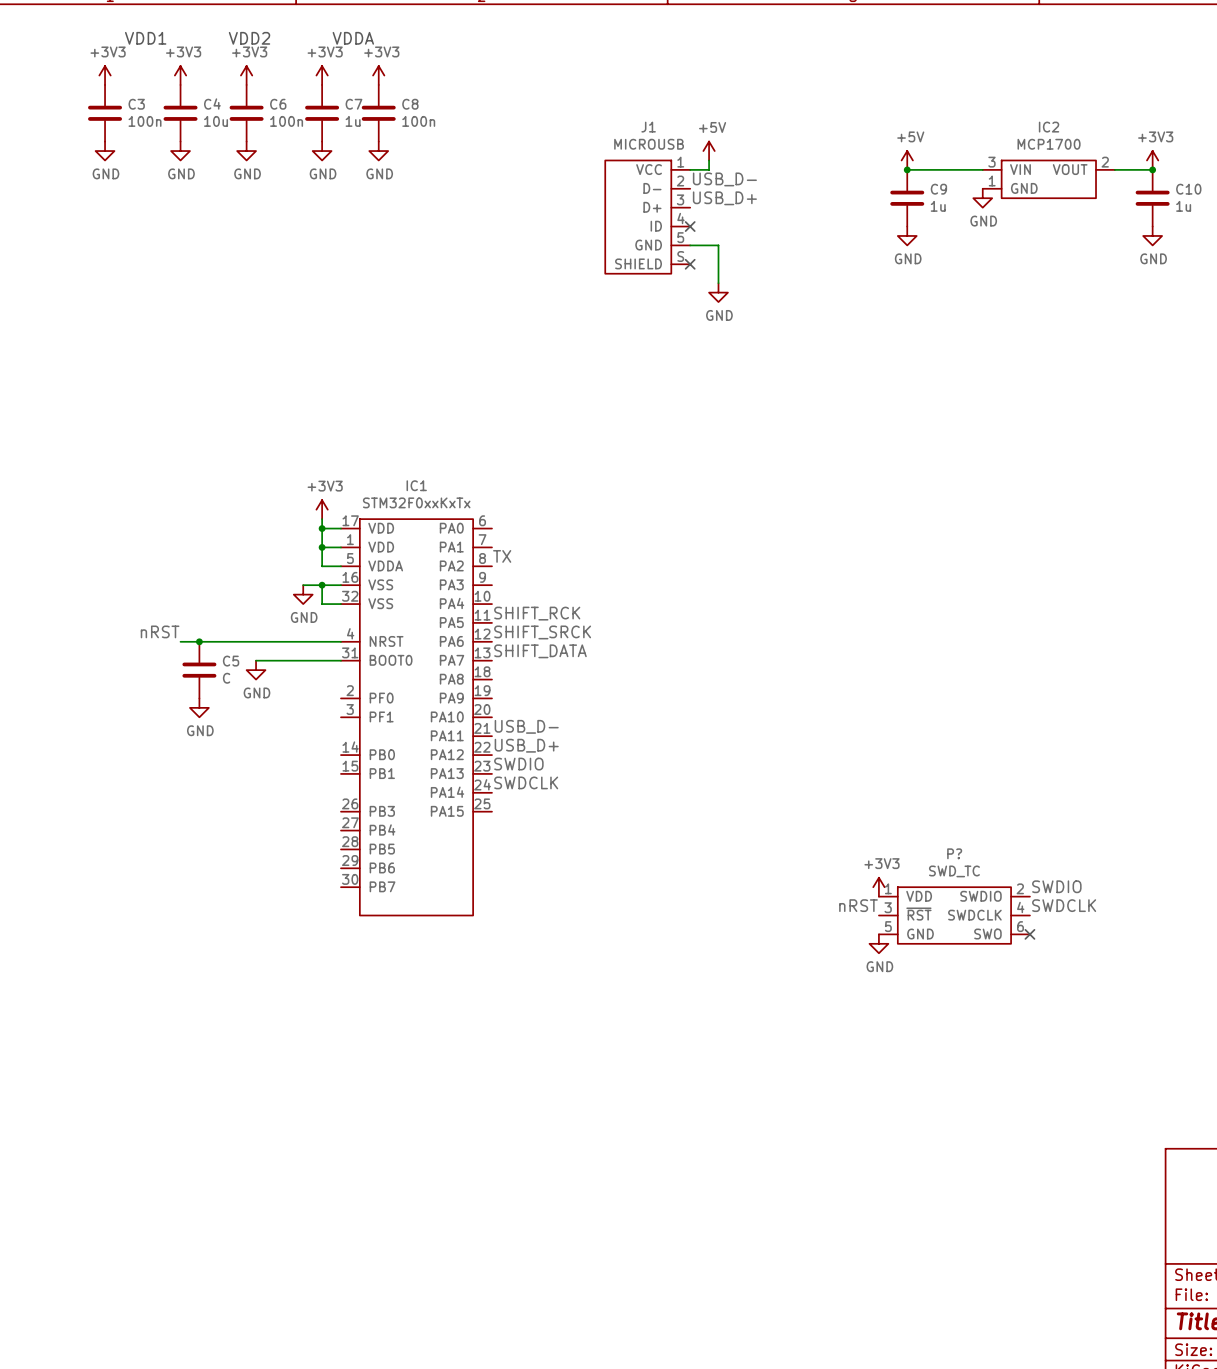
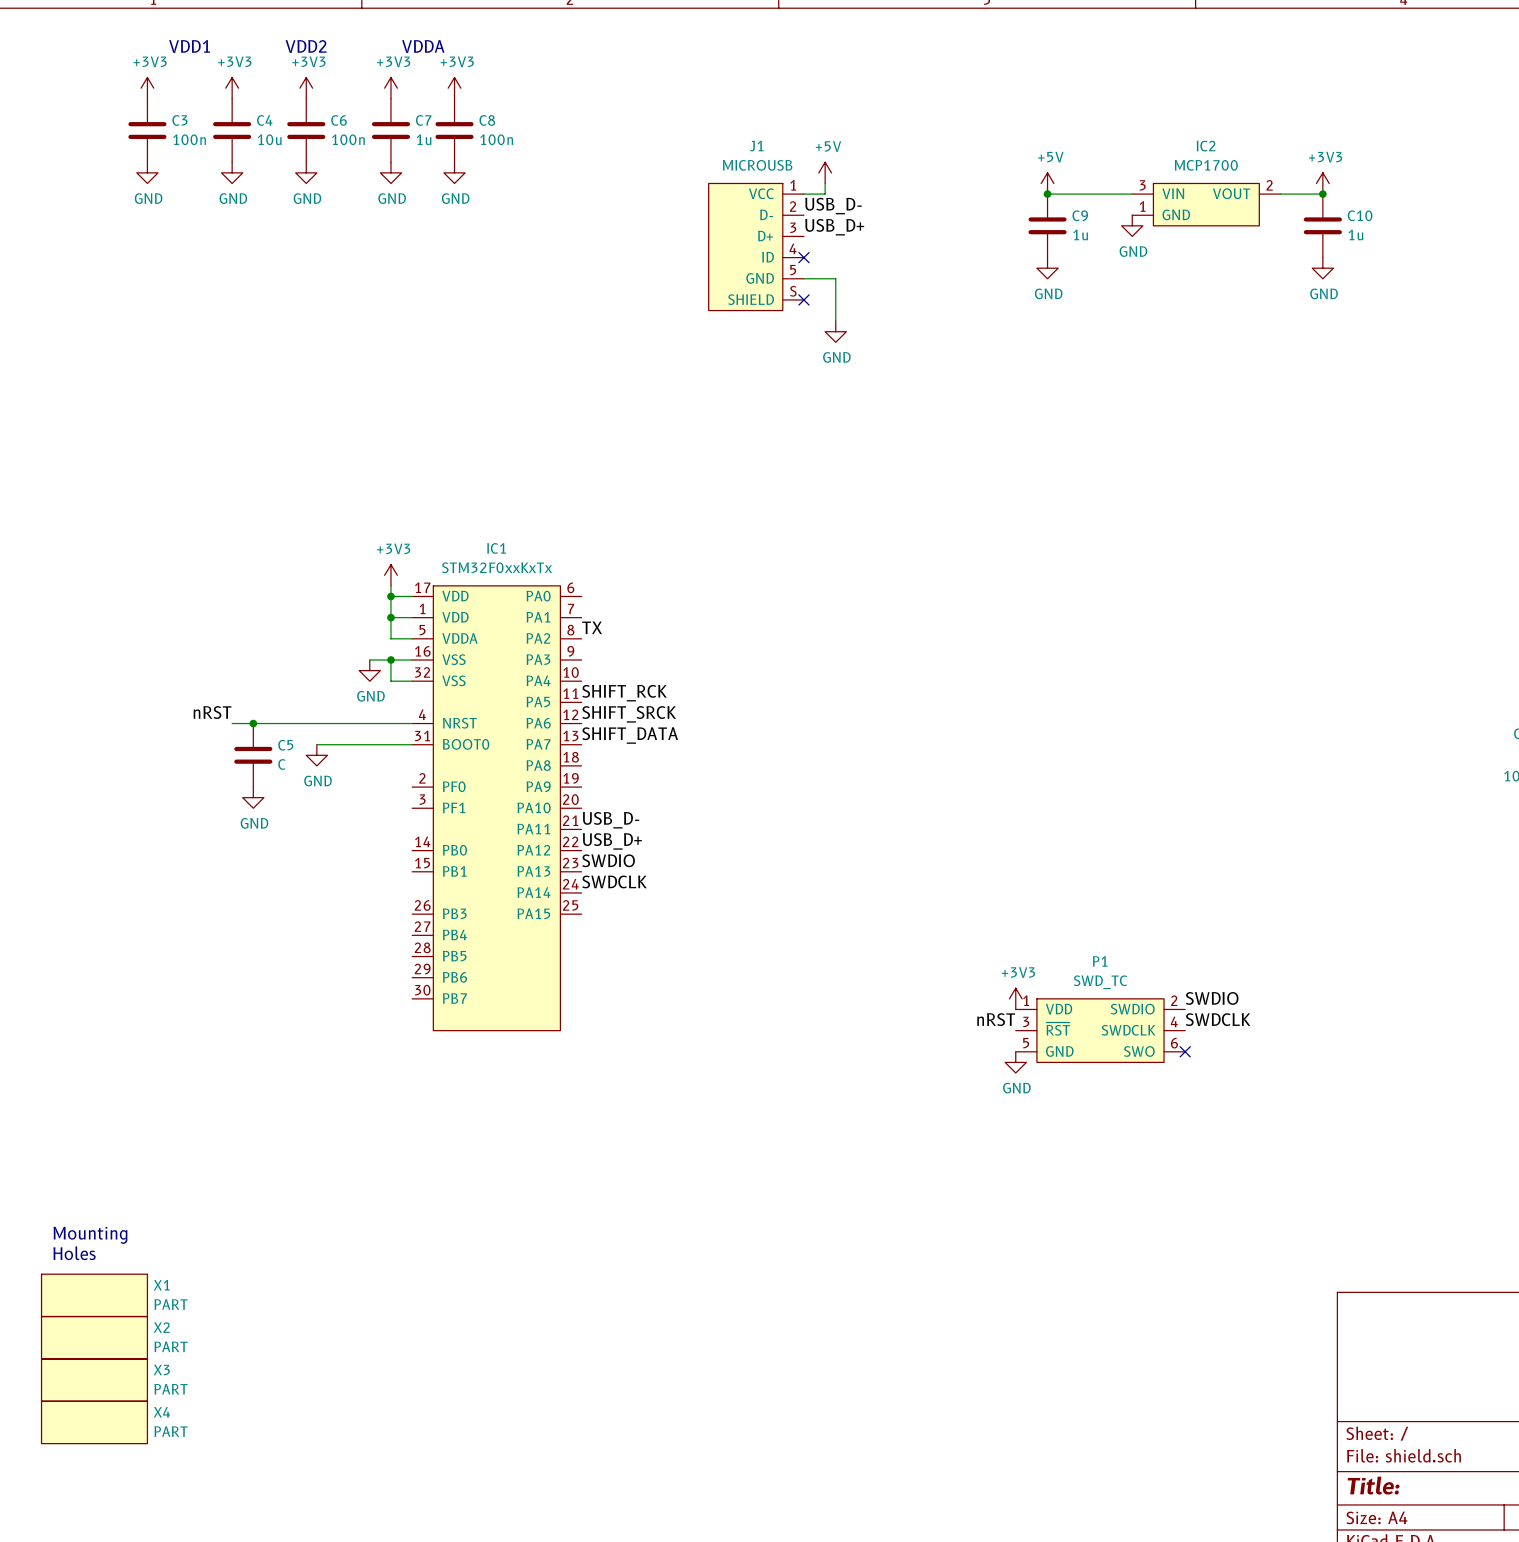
P? name: P? (954, 853) -> P1 (1100, 961)
text: none -> Mounting (90, 1235)
text: none -> Holes (74, 1253)
X1: none -> PART (94, 1295)
X2: none -> PART (94, 1337)
X3: none -> PART (94, 1380)
X4: none -> PART (94, 1422)

